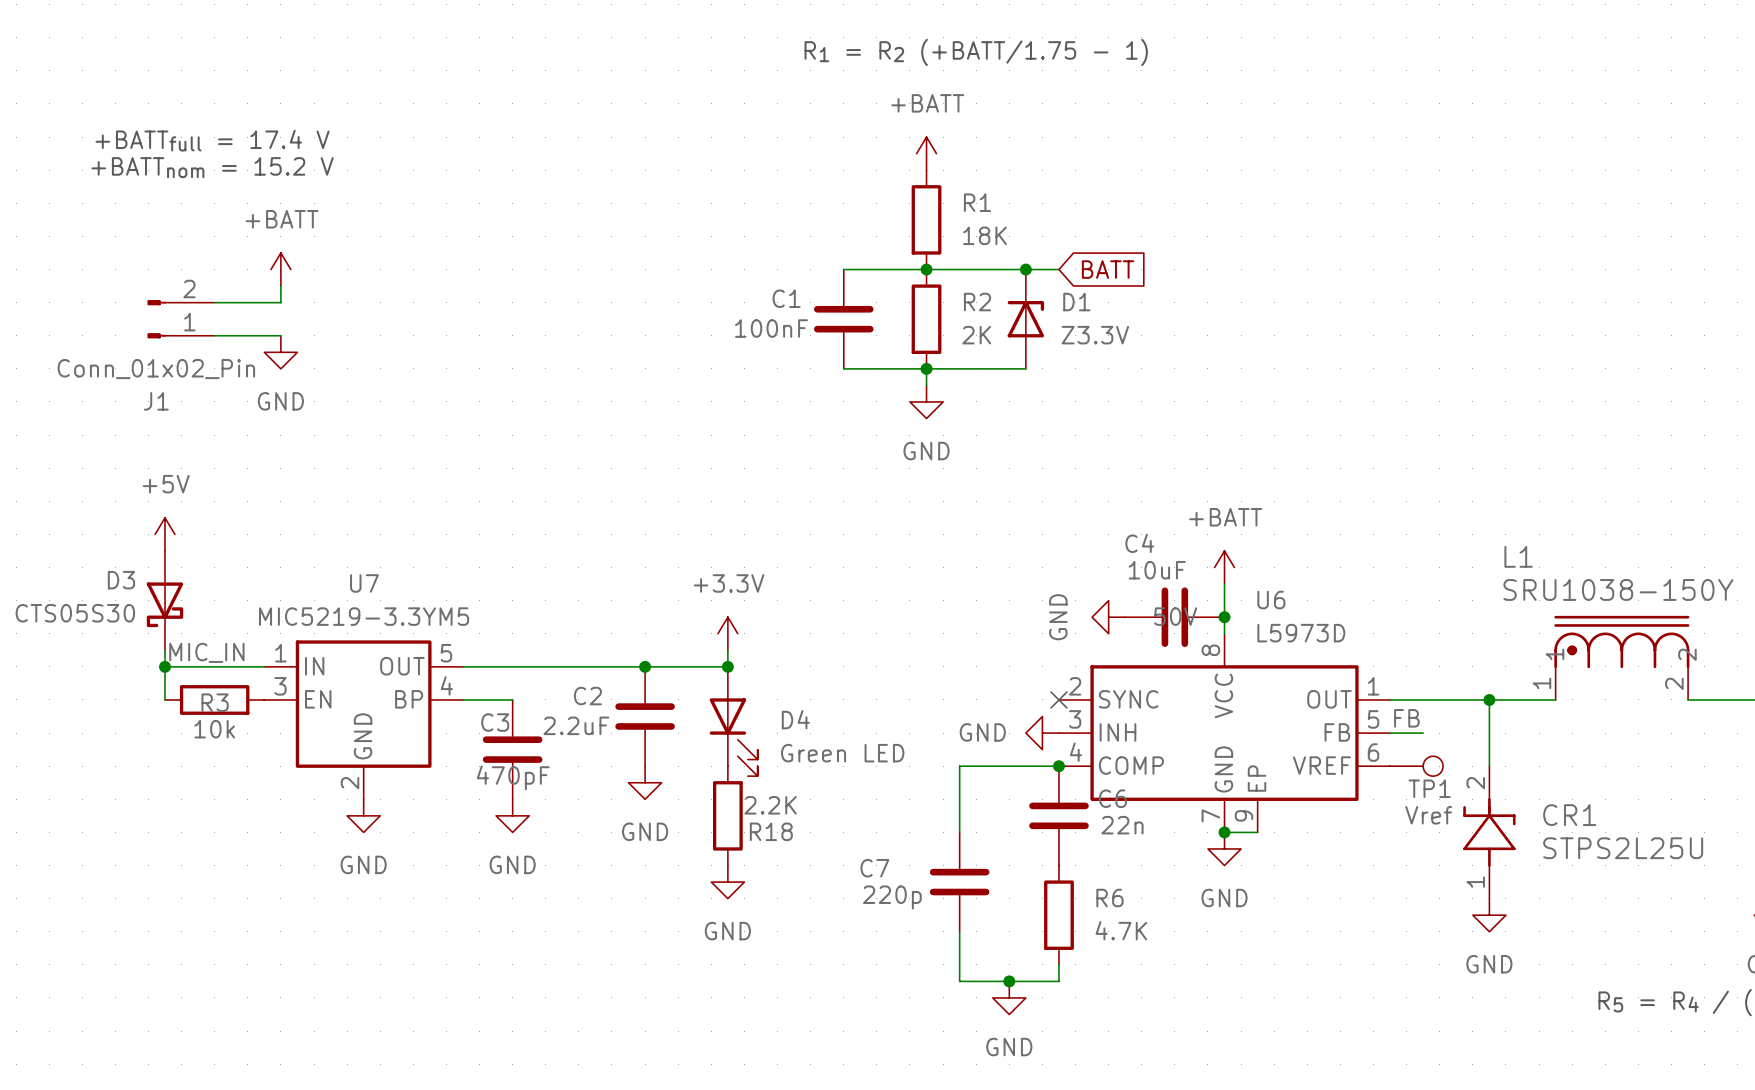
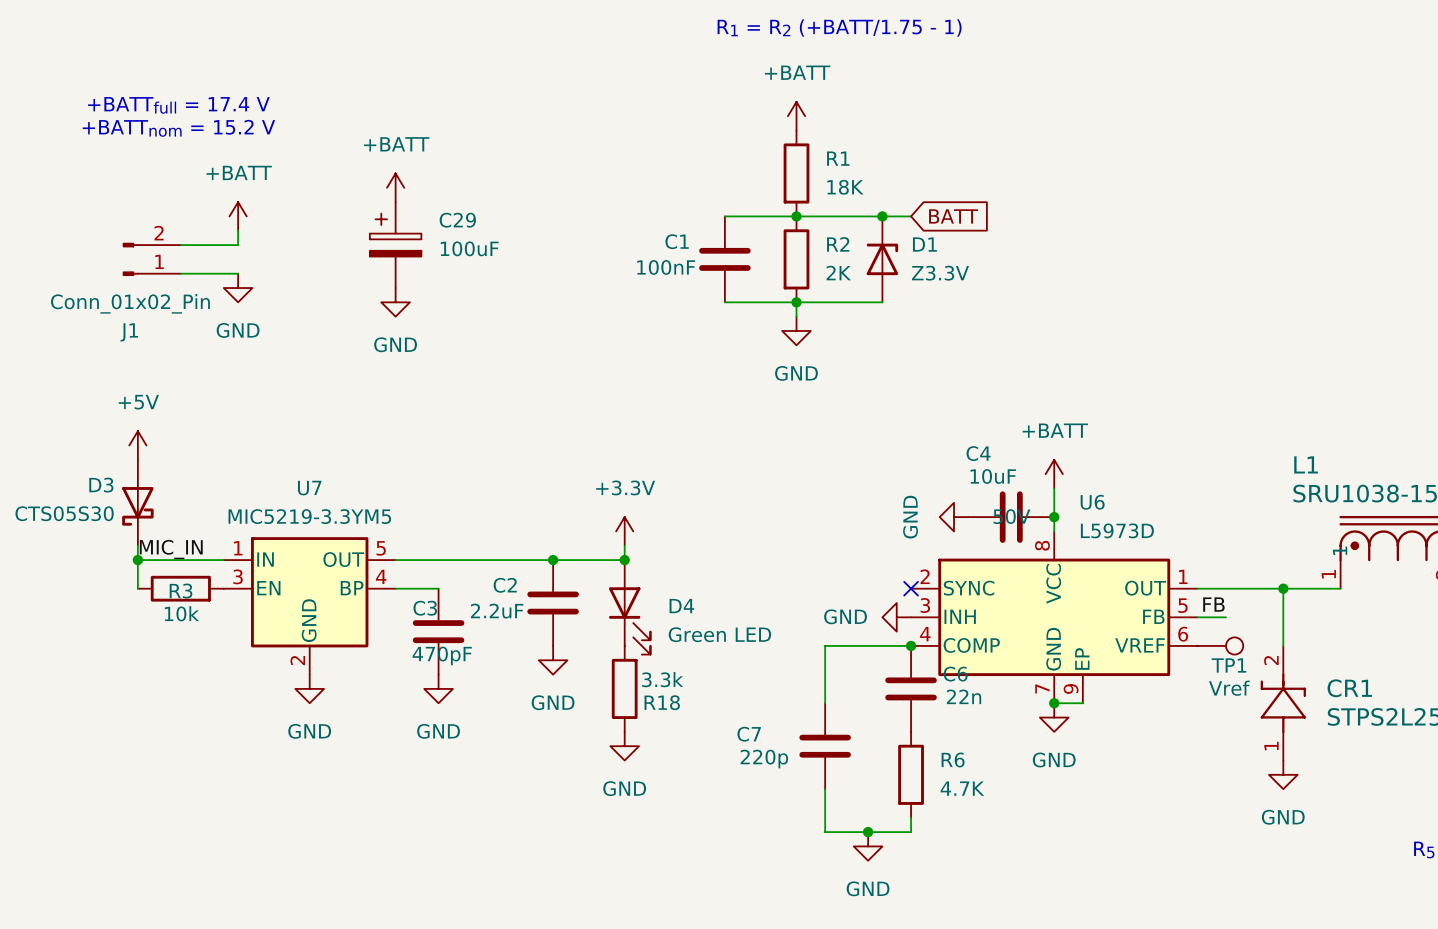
power symbol: none -> +BATT (395, 187)
C29: none -> 100uF (395, 245)
power symbol: none -> GND (395, 302)
R18 value: 2.2K (770, 805) -> 3.3k (662, 679)

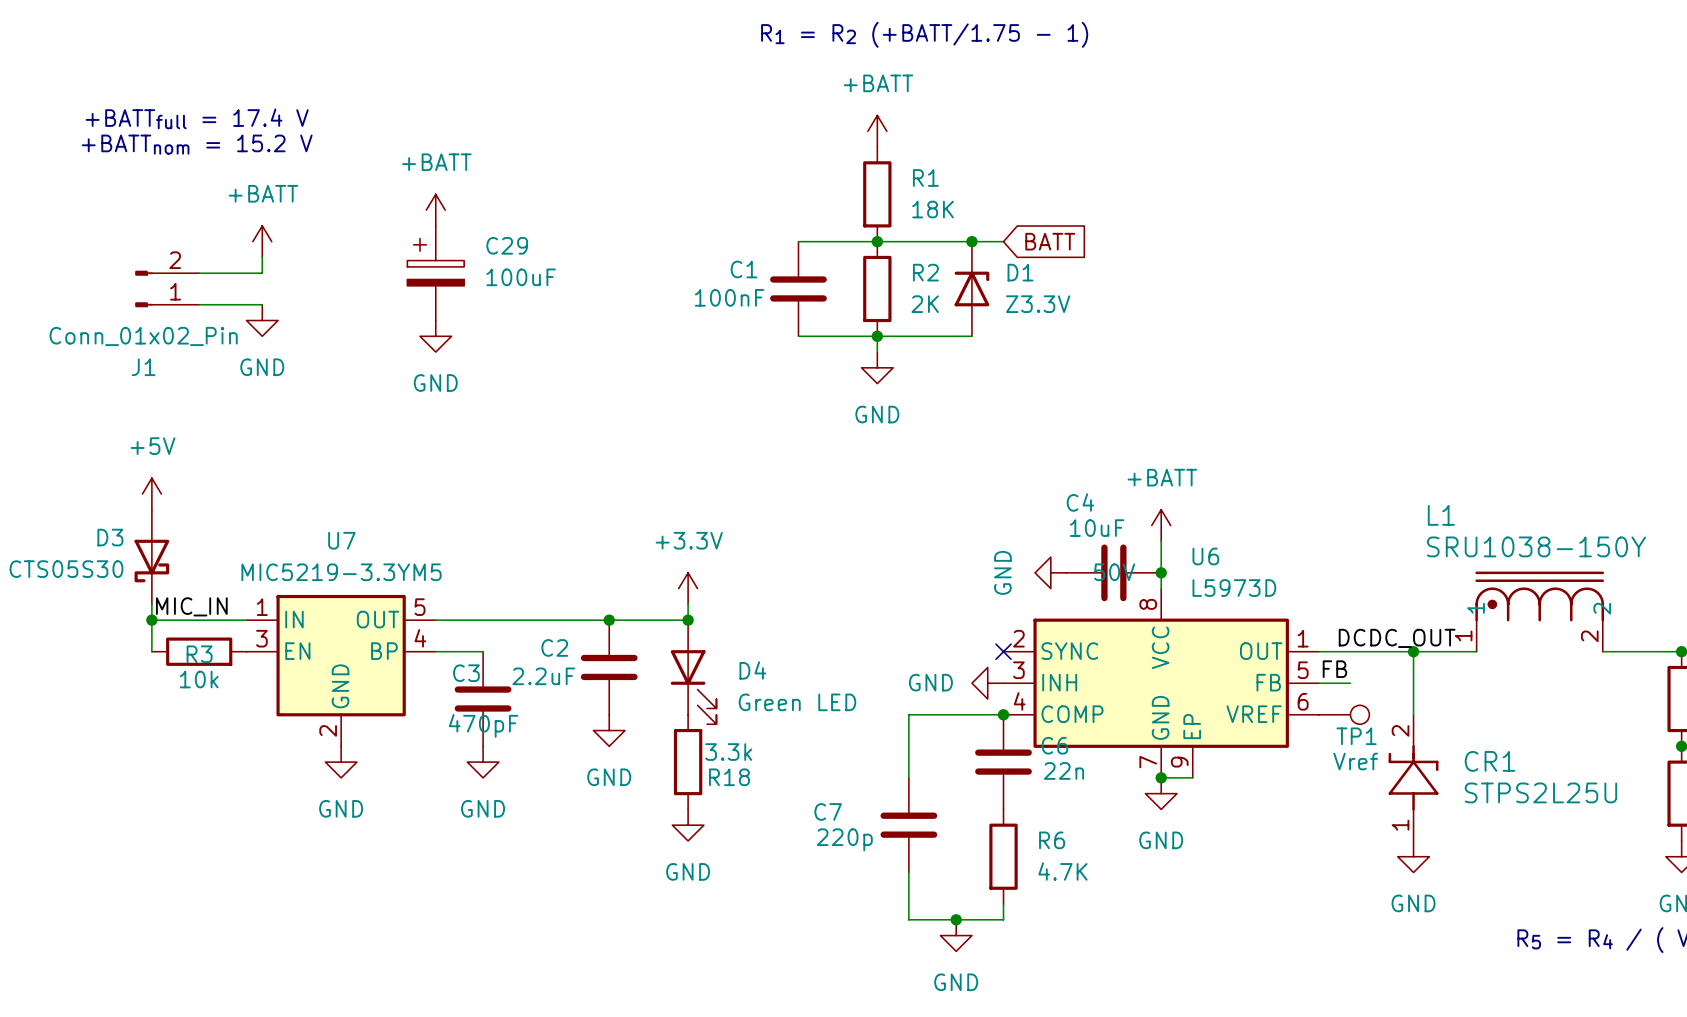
label: none -> DCDC_OUT (1397, 638)

